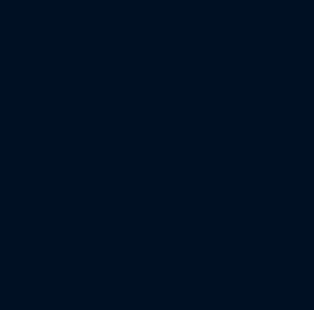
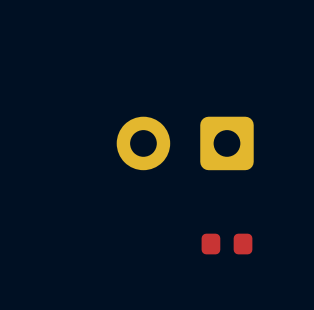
part: none -> (185, 143)
part: none -> (226, 244)

